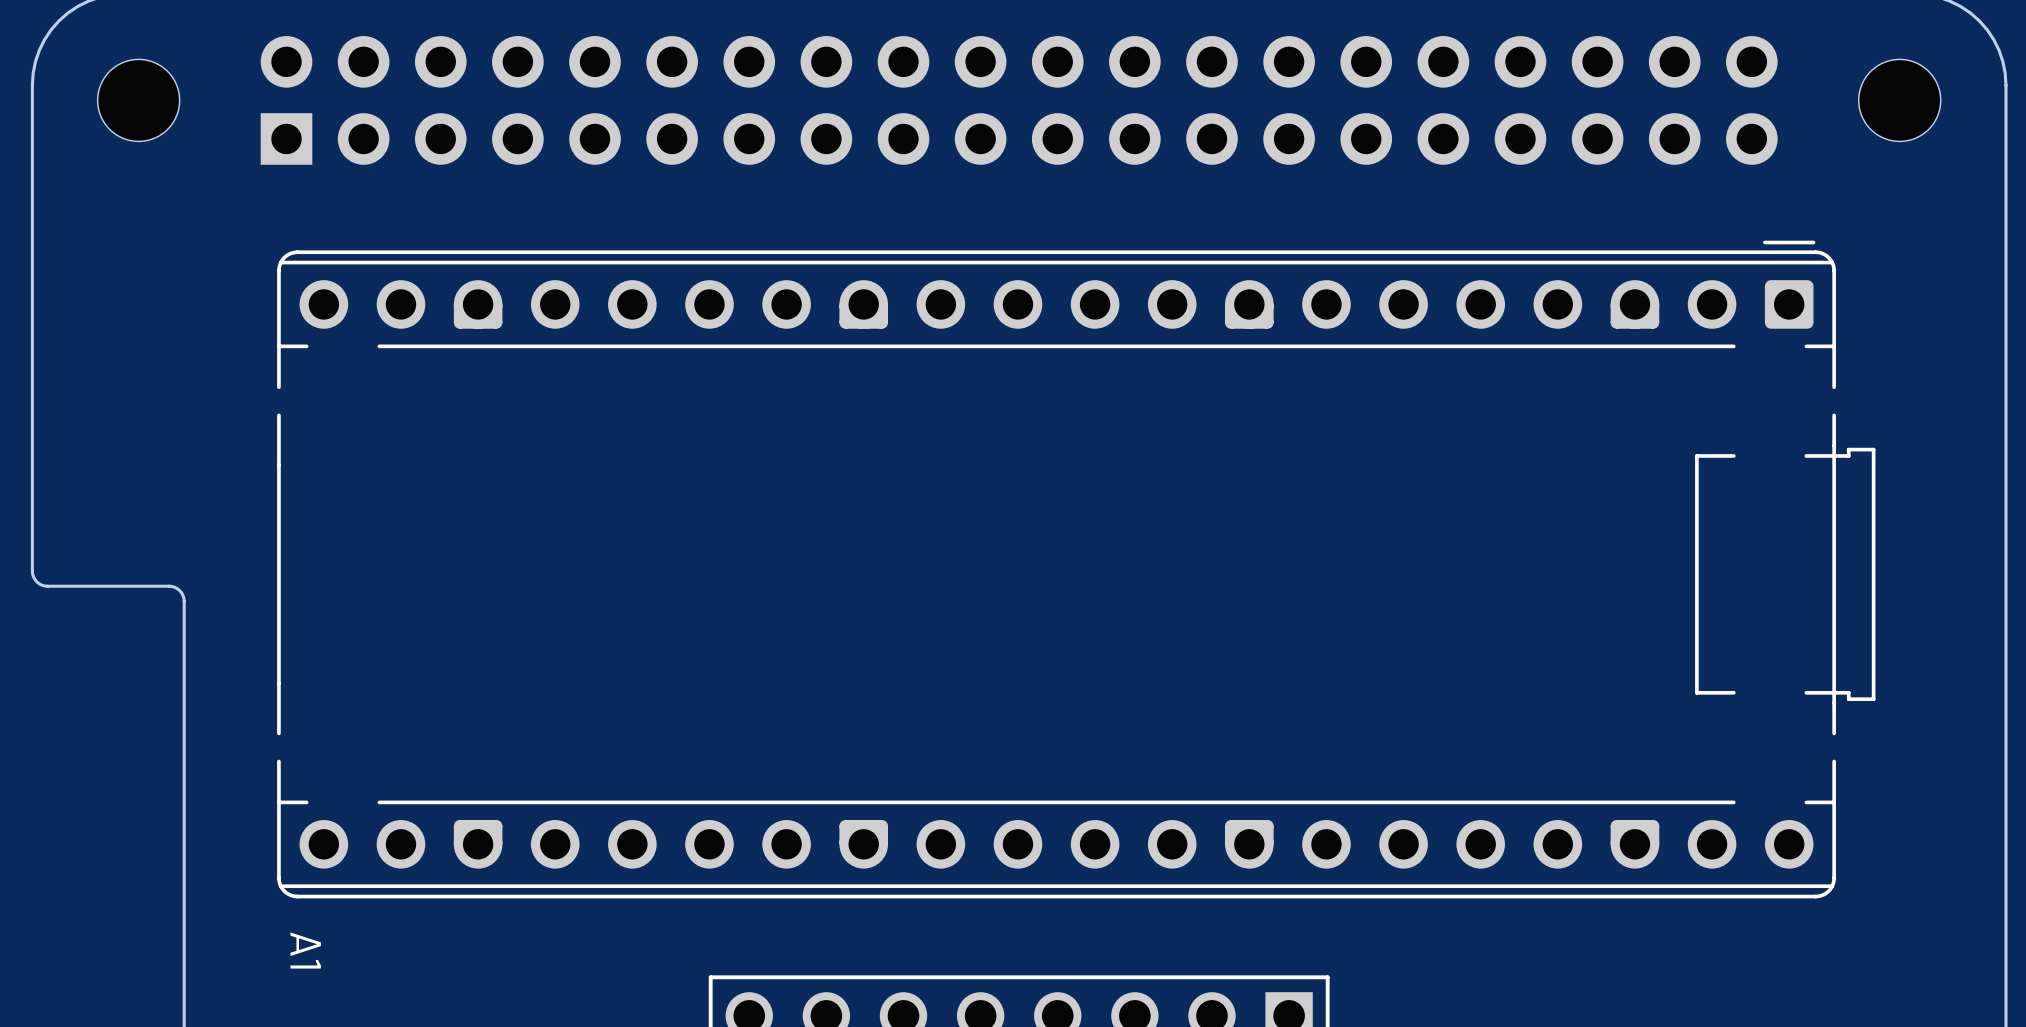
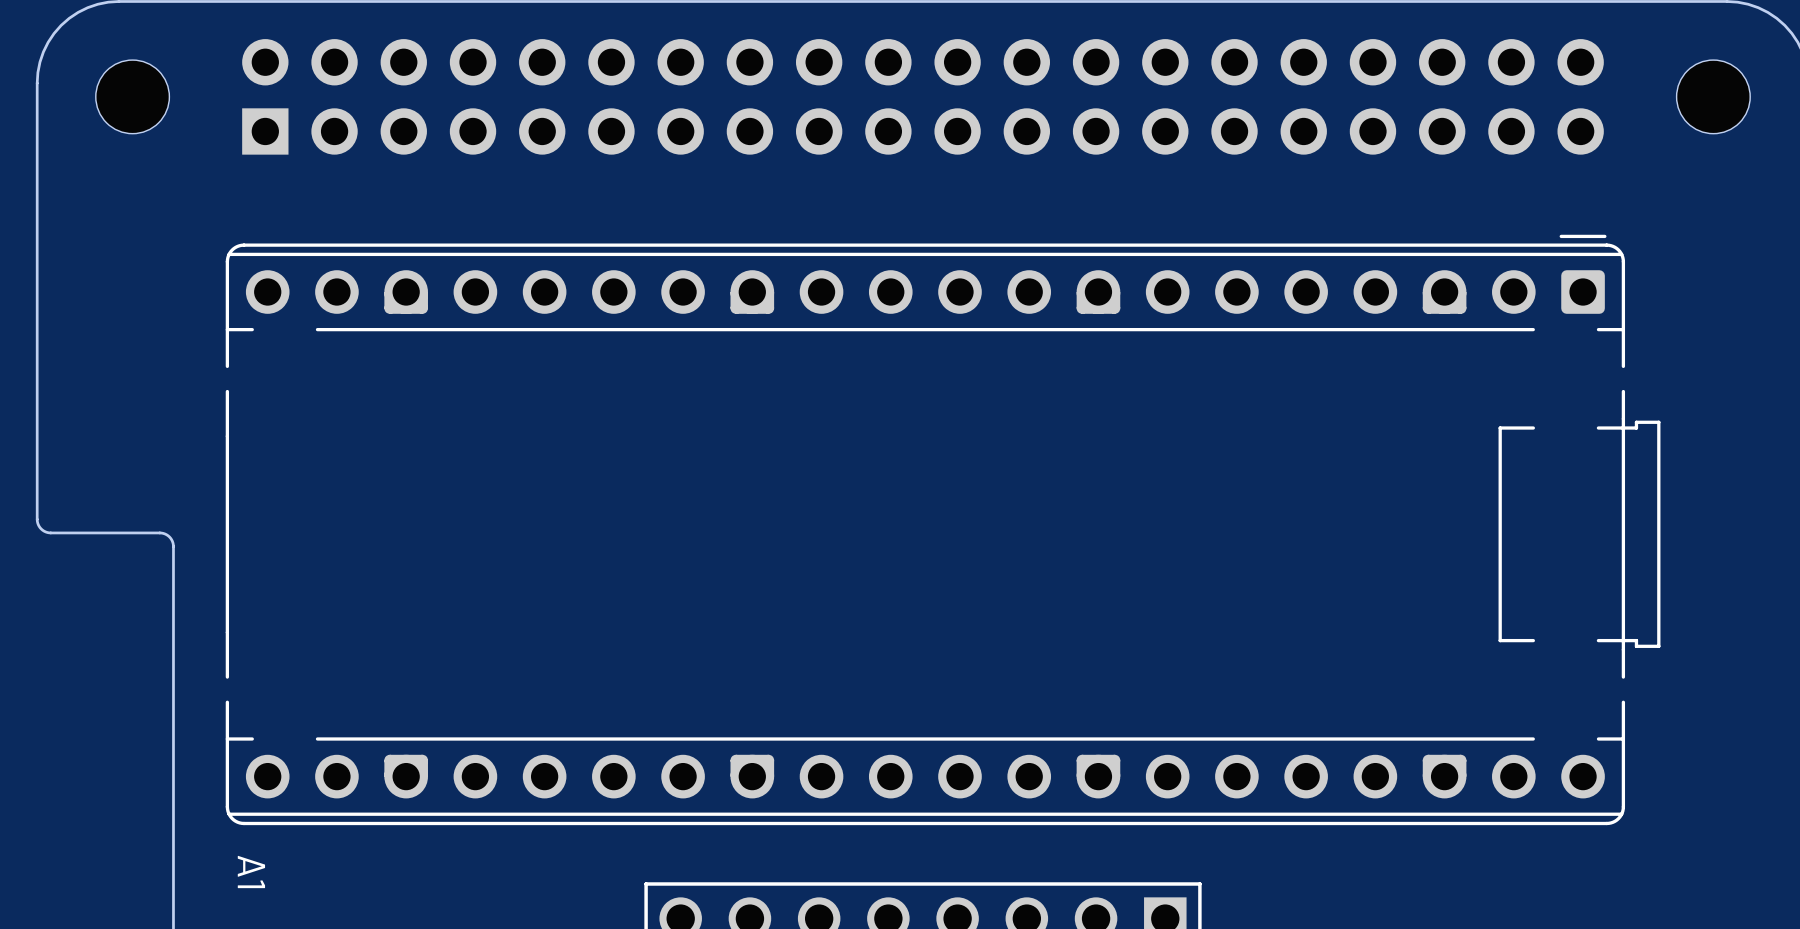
A1 position: (1076, 569) -> (943, 529)

